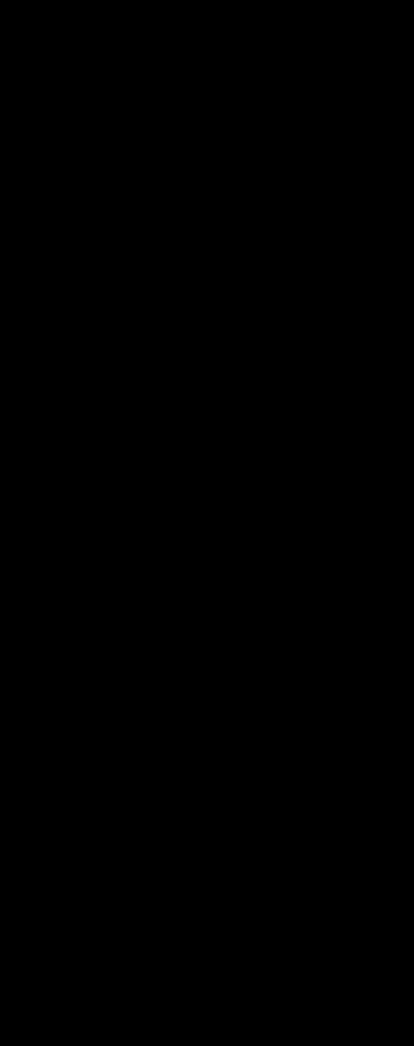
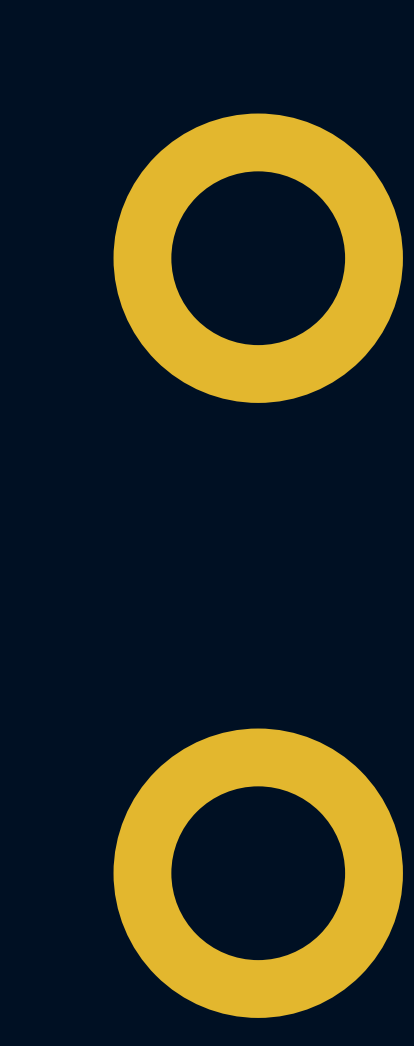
part: none -> (258, 258)
part: none -> (258, 873)

